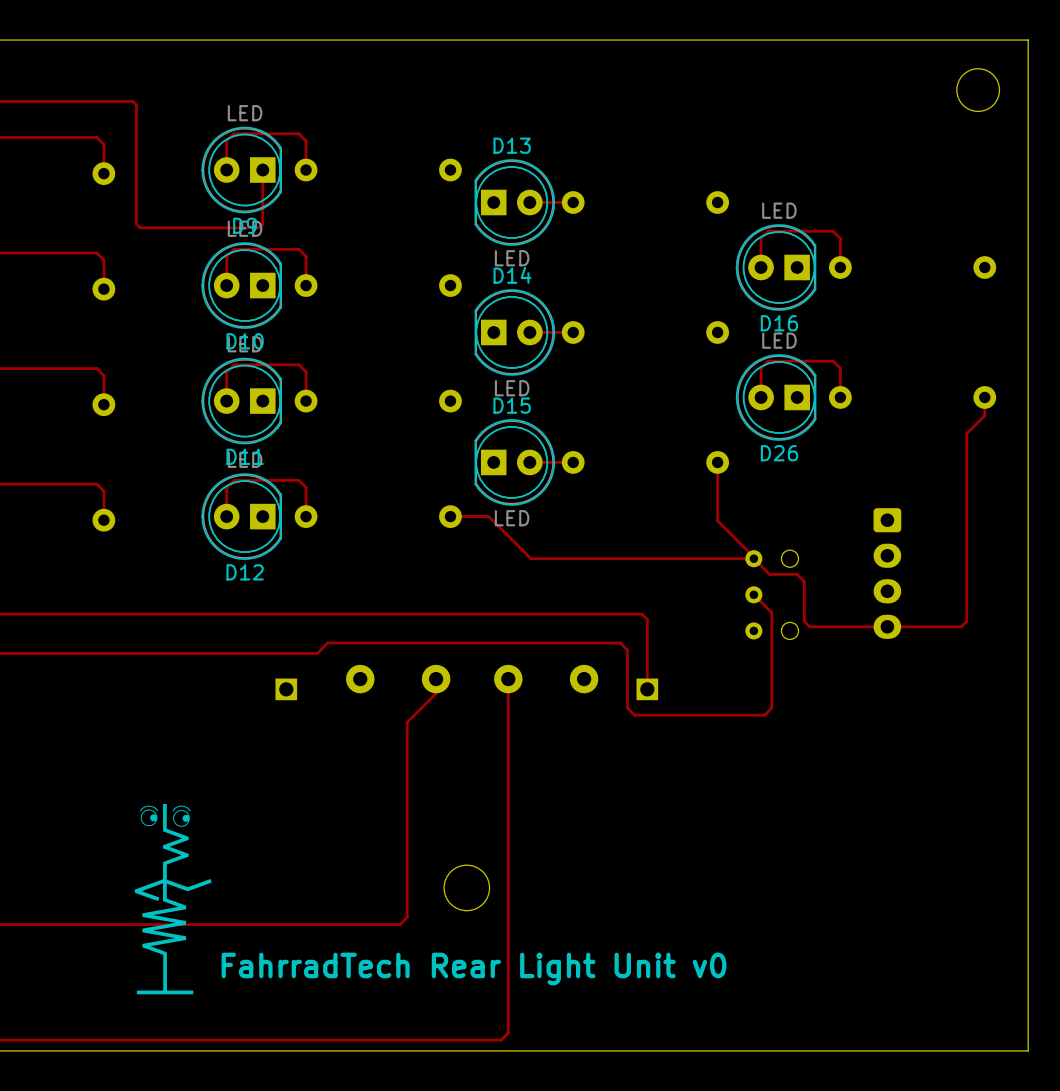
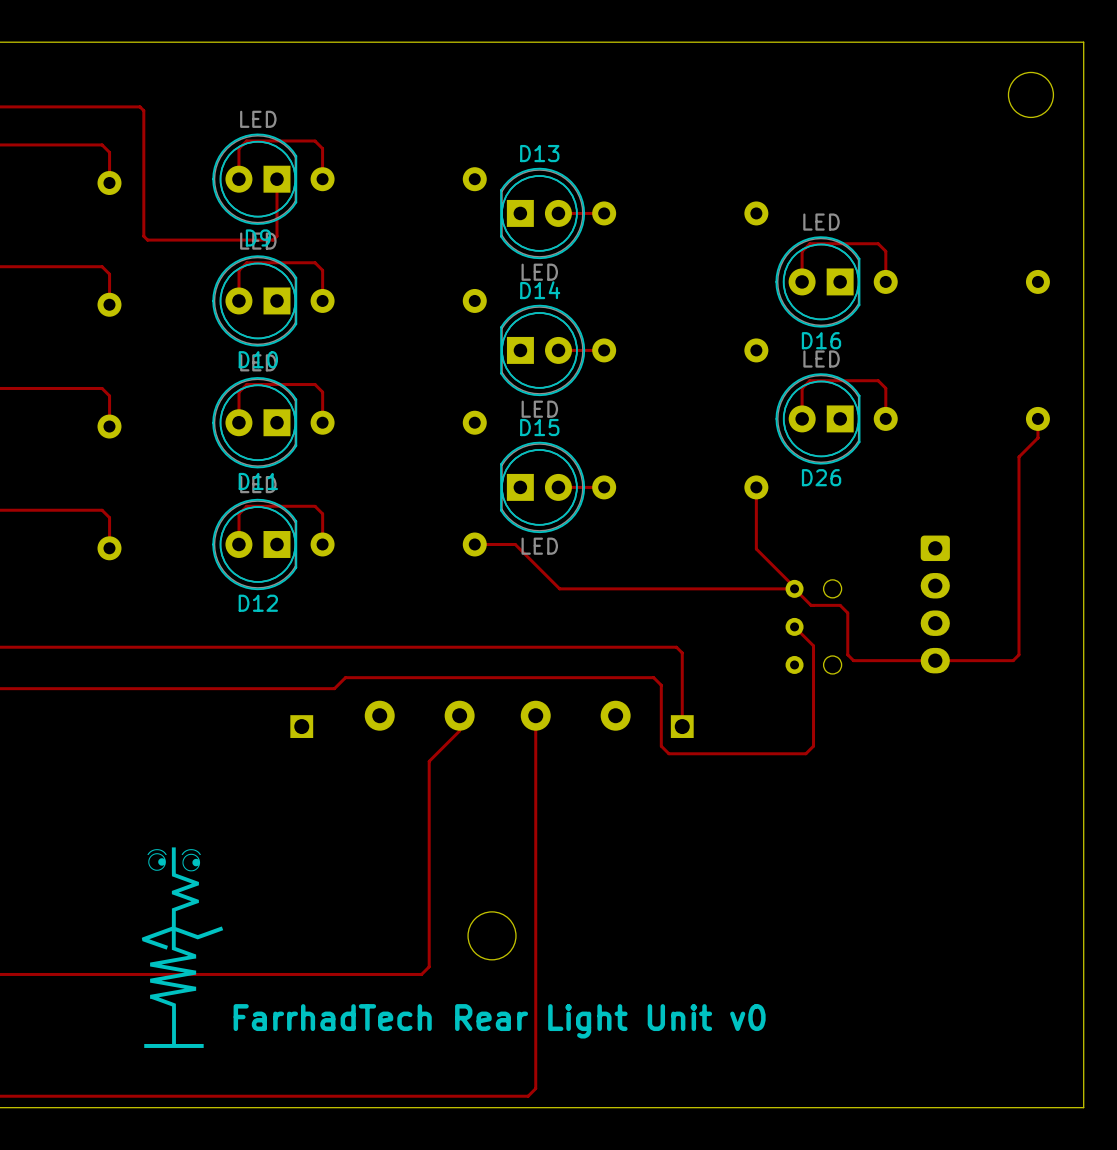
text: FahrradTech Rear Light Unit v0 (474, 969) -> FarrhadTech Rear Light Unit v0 (499, 1021)

